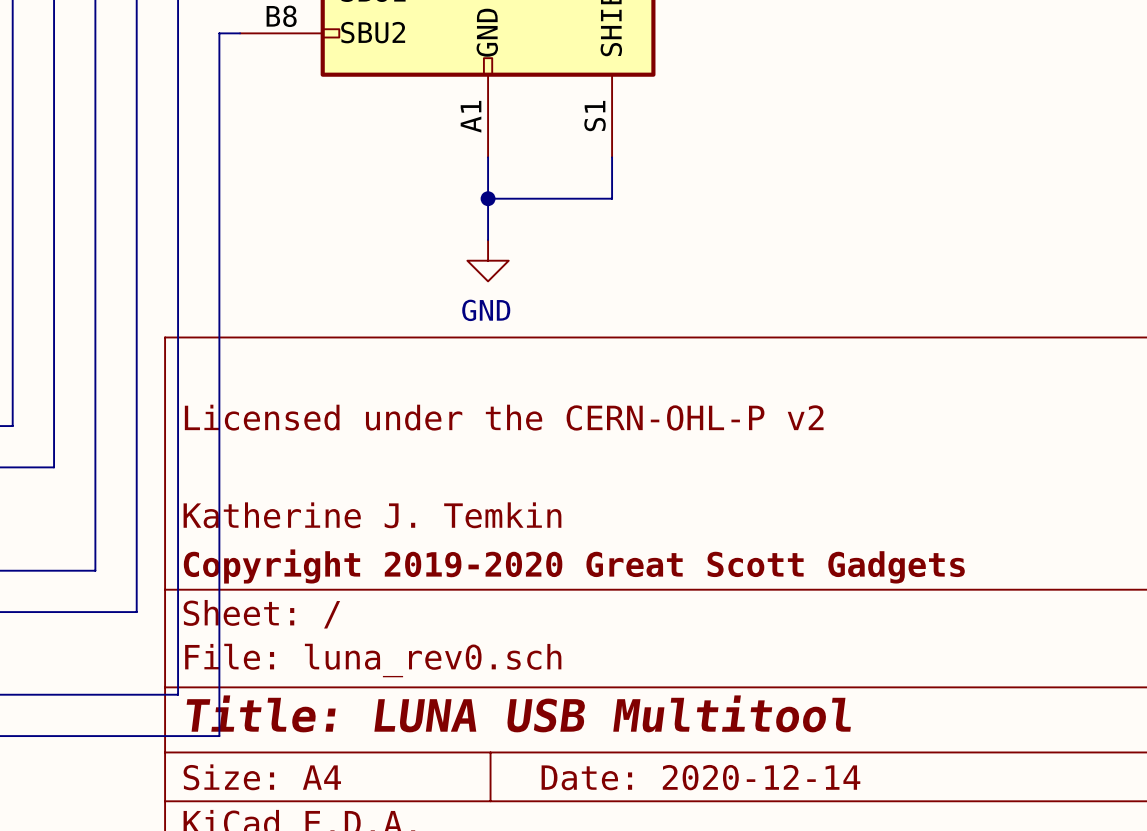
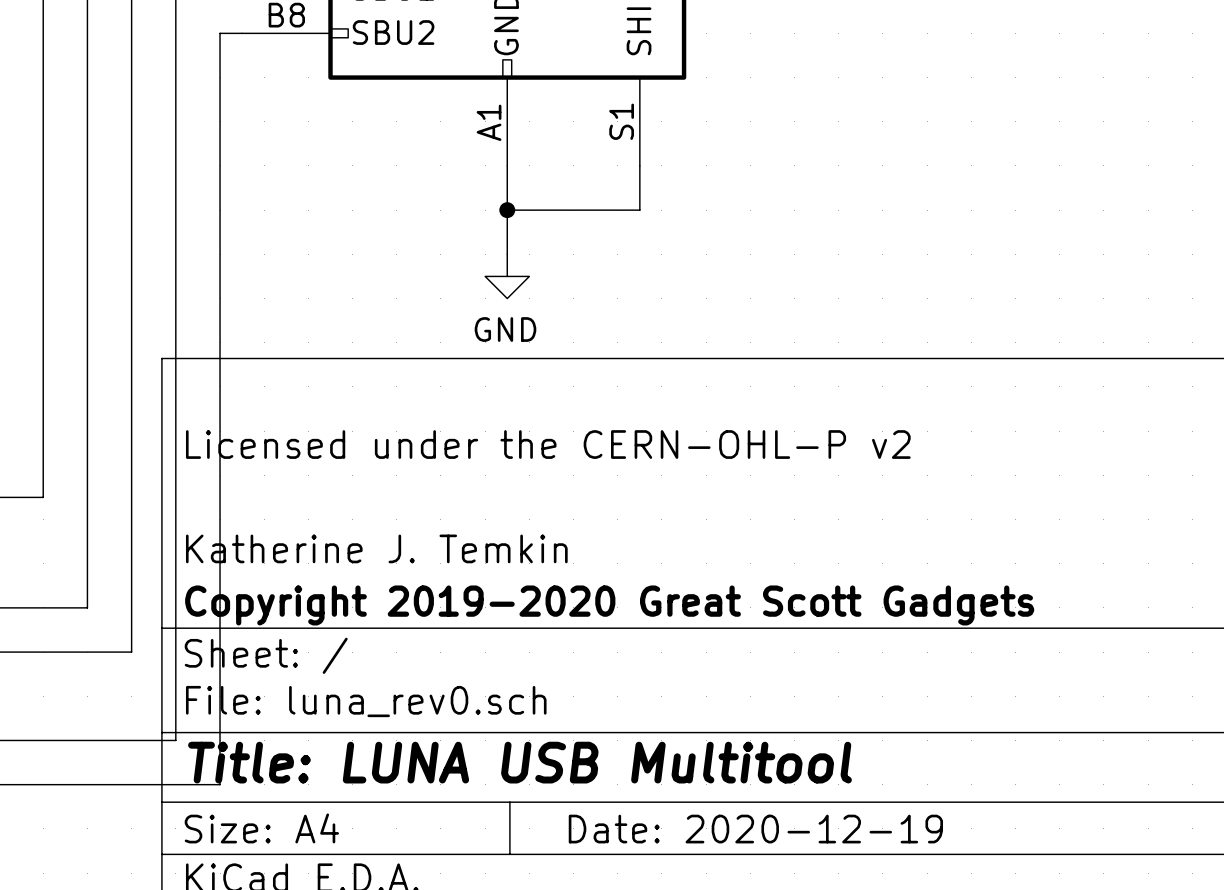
title block: Date: 2020-12-14 (700, 777) -> Date: 2020-12-19 (755, 829)

